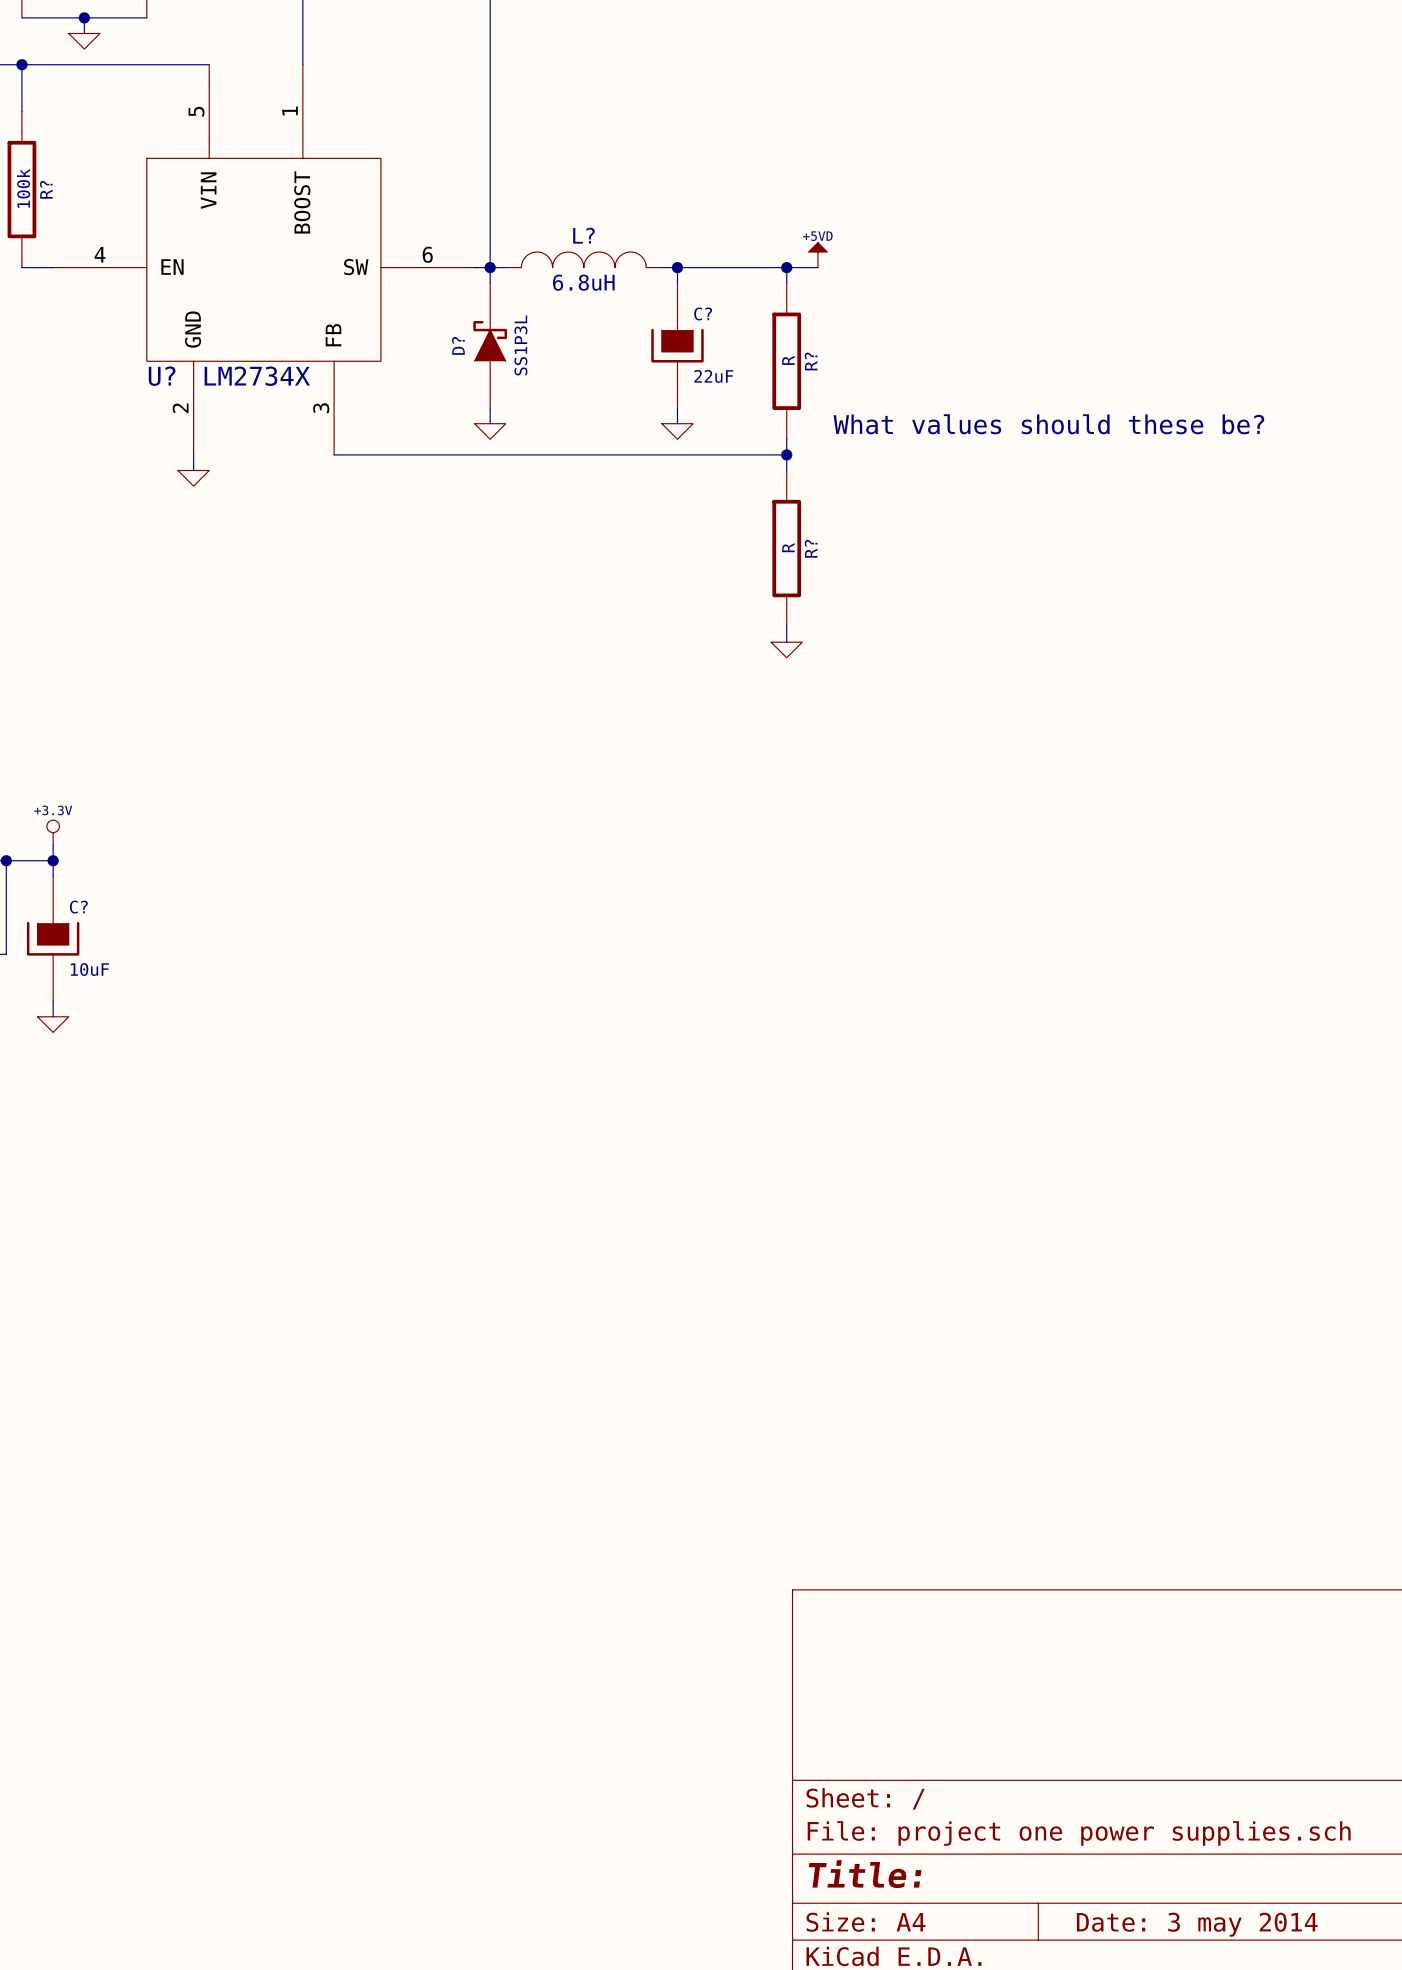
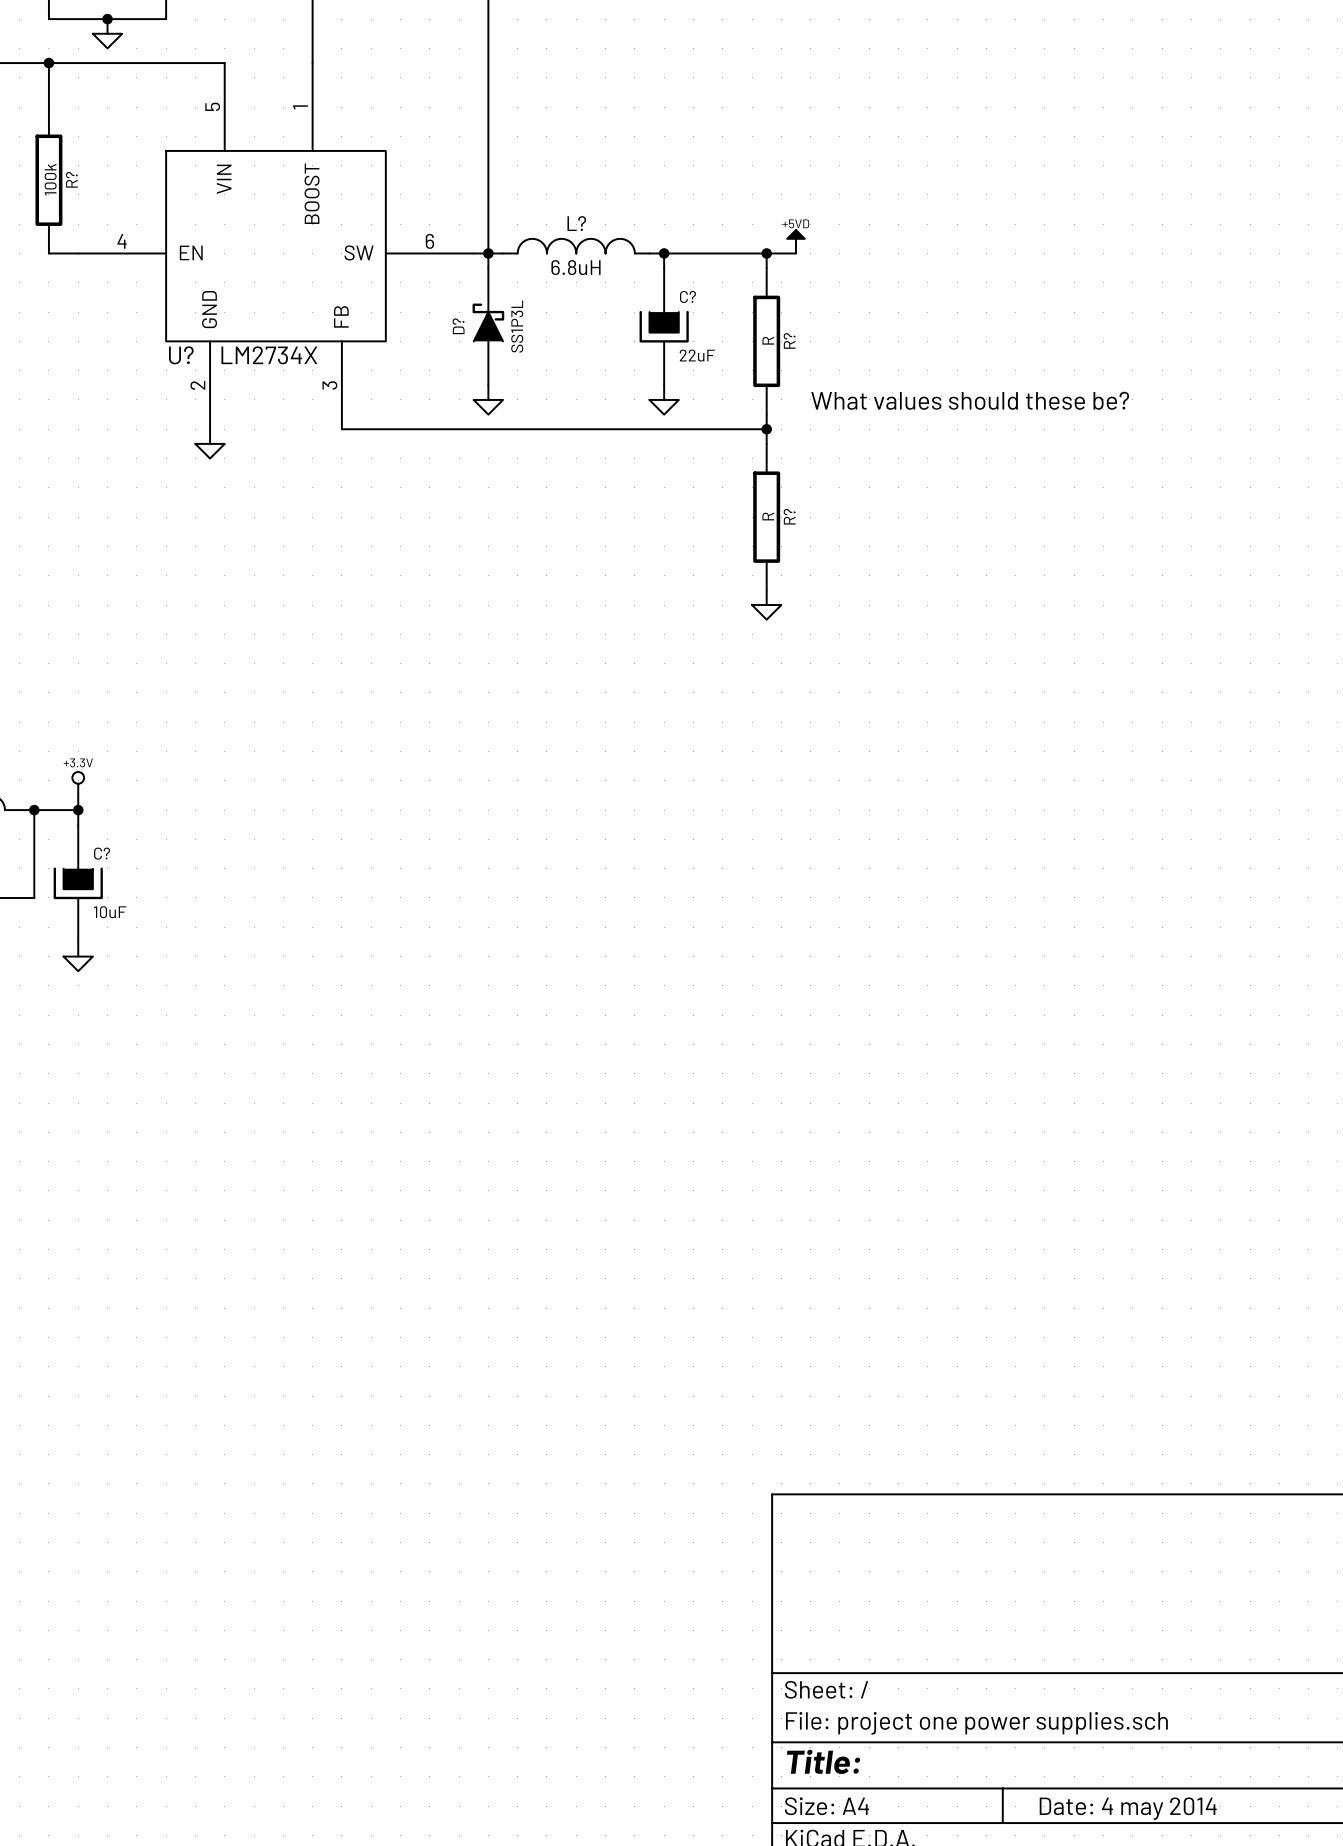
title block: Date: 3 may 2014 (1197, 1924) -> Date: 4 may 2014 (1128, 1808)

